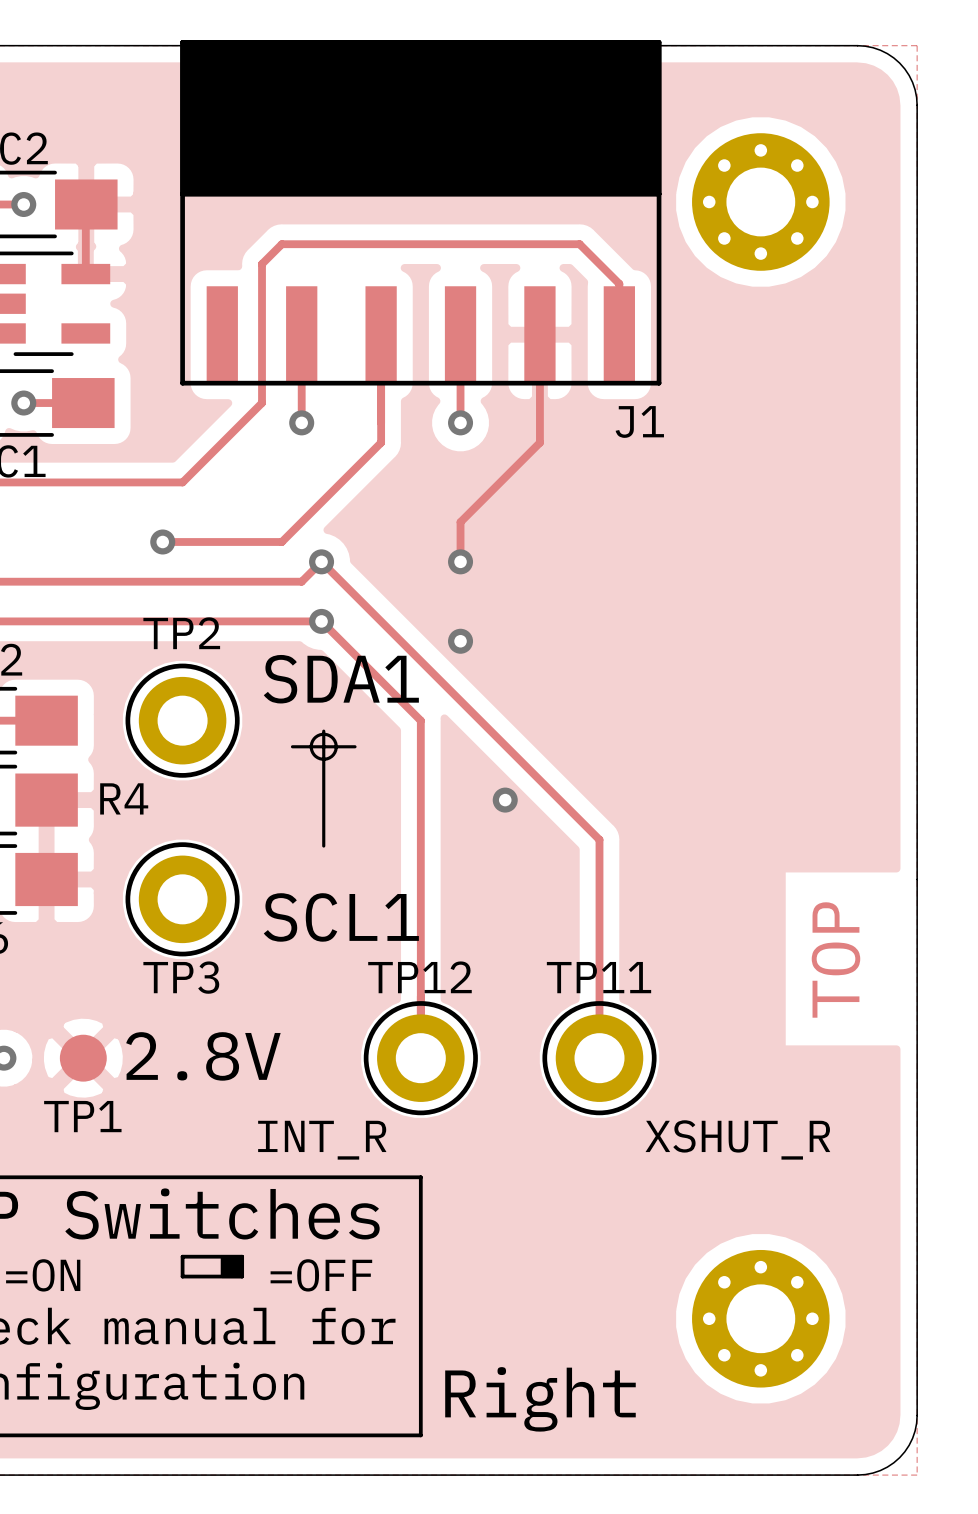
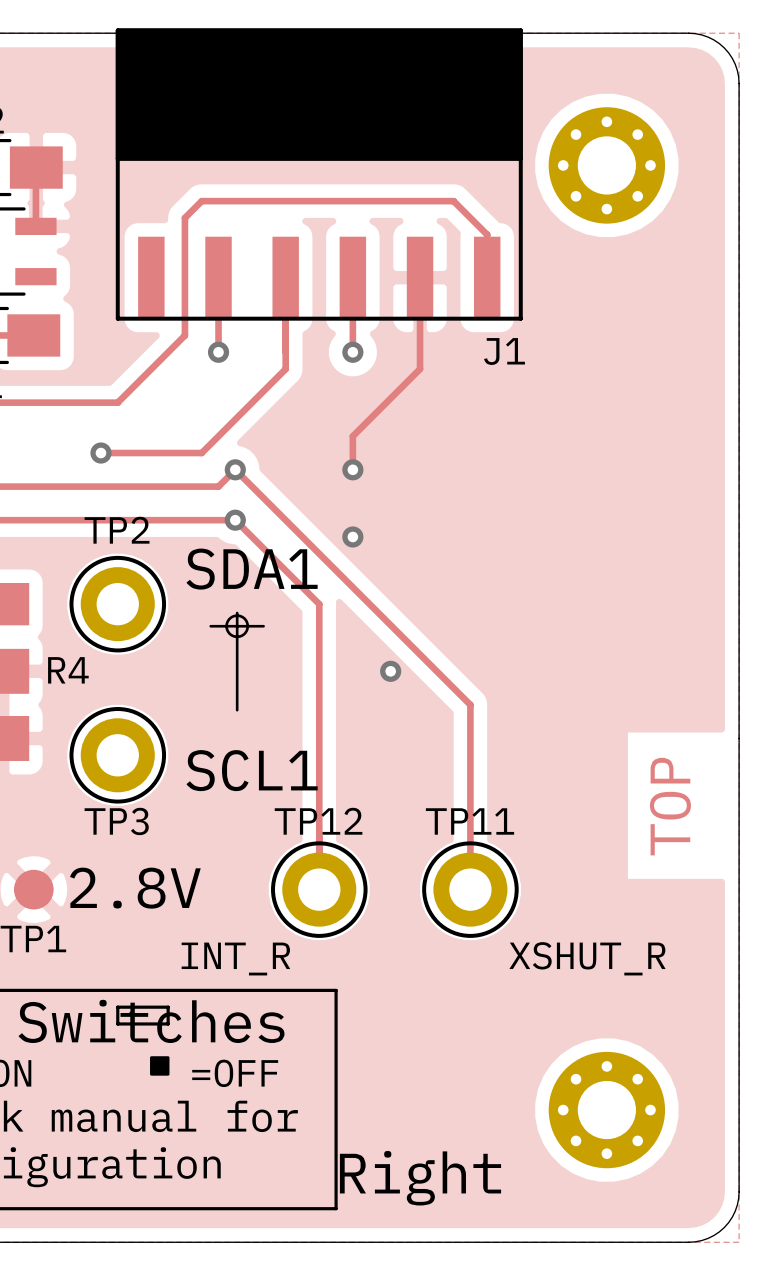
line: (420, 1177) (420, 1435) -> (319, 990) (336, 990) (336, 1208) (319, 1208)
line: (182, 1256) (242, 1256) (242, 1276) (182, 1276) (182, 1256) -> (117, 1007) (168, 1007) (168, 1023) (117, 1023) (117, 1007)

